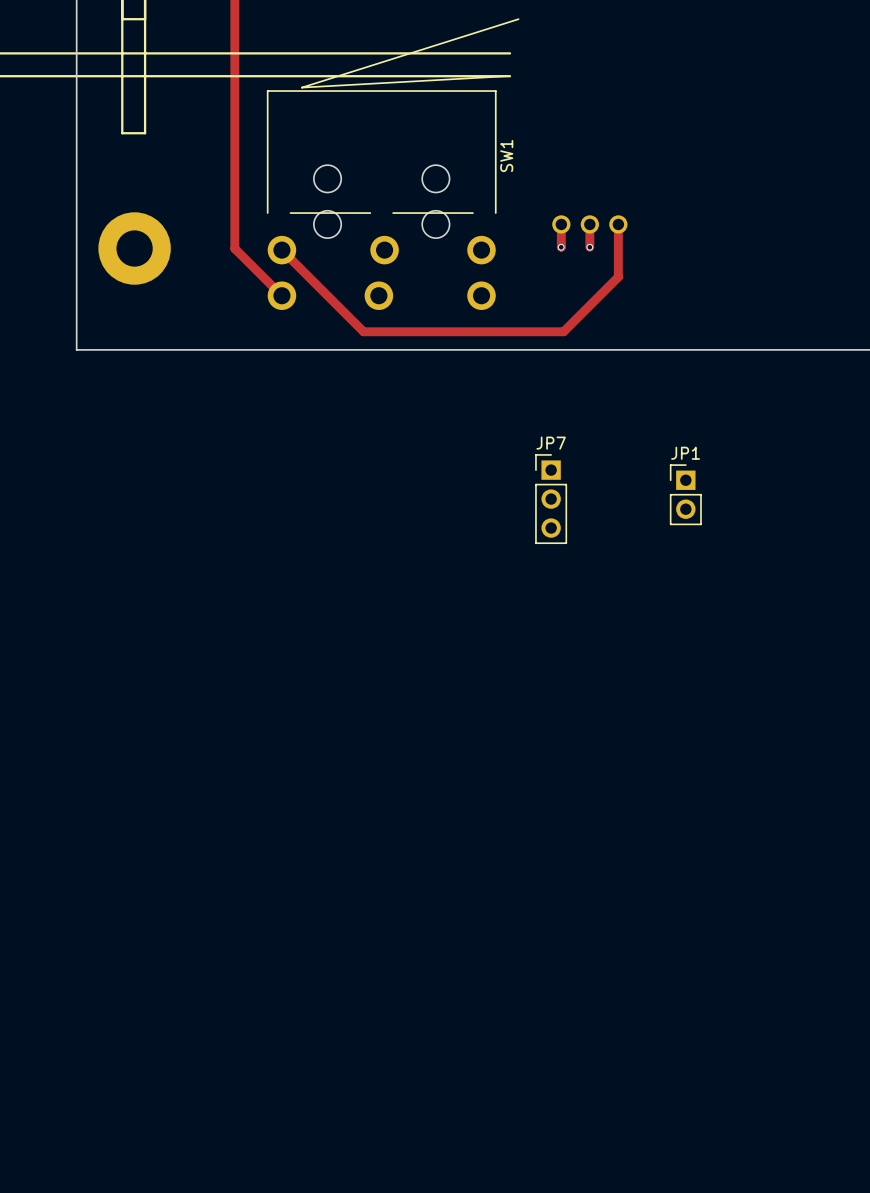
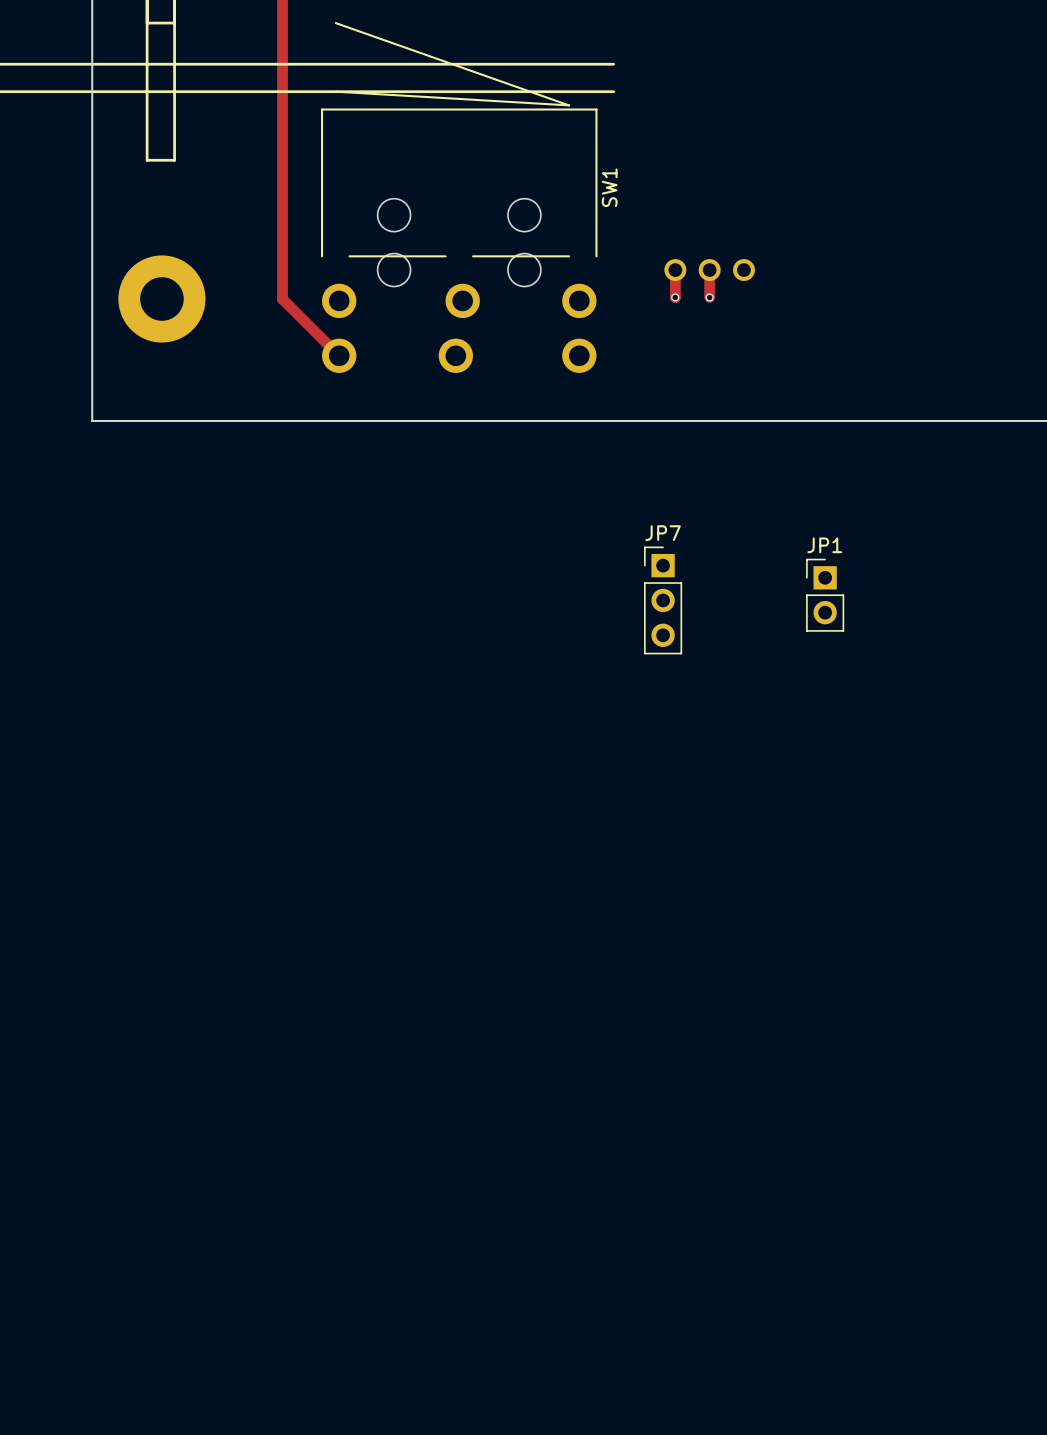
SW1 footprint: [266, 18, 520, 265] -> [321, 22, 598, 319]
track: (618, 224) (618, 277) (563, 331) (363, 331) (281, 250) -> none

